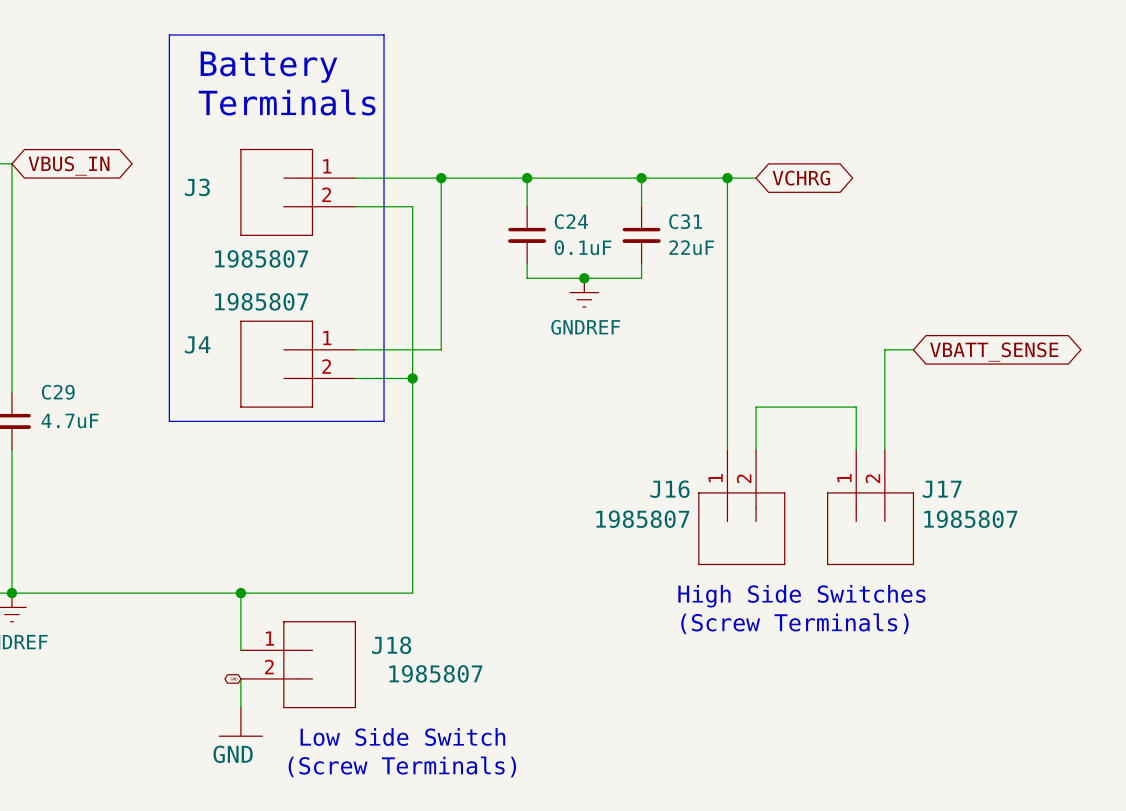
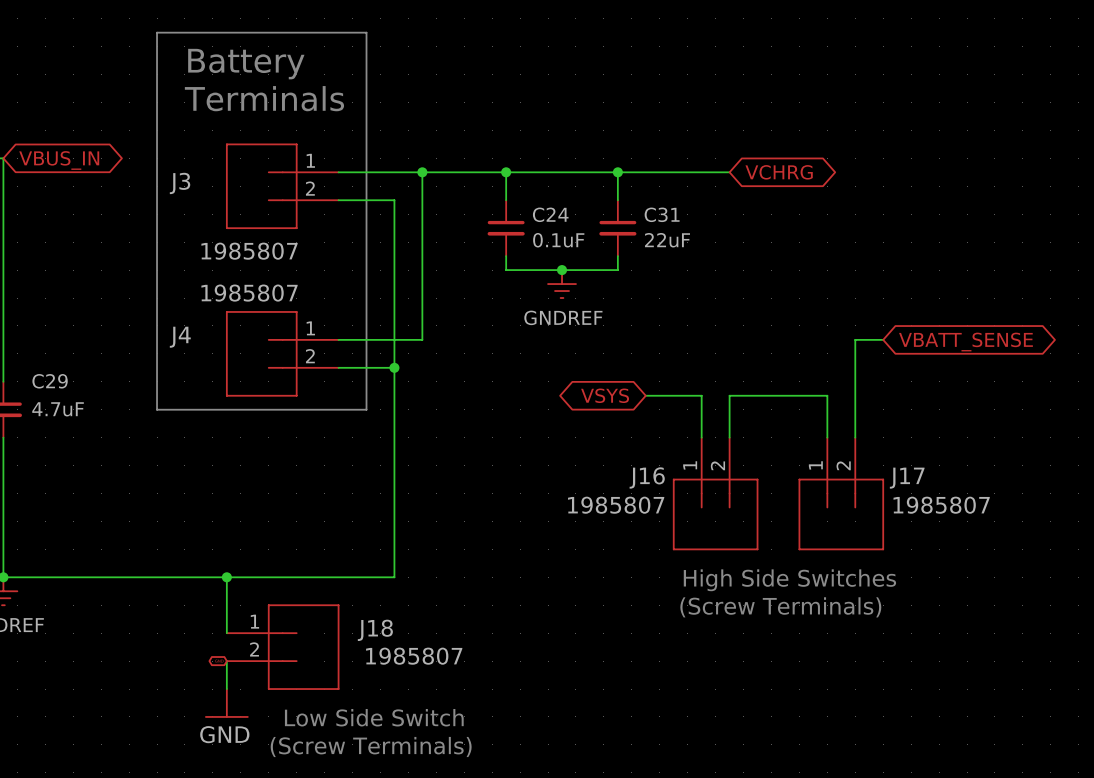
wire: (727, 178) (727, 407) -> (645, 395) (701, 395)
junction: (727, 178) -> none
global label: none -> VSYS (605, 395)

